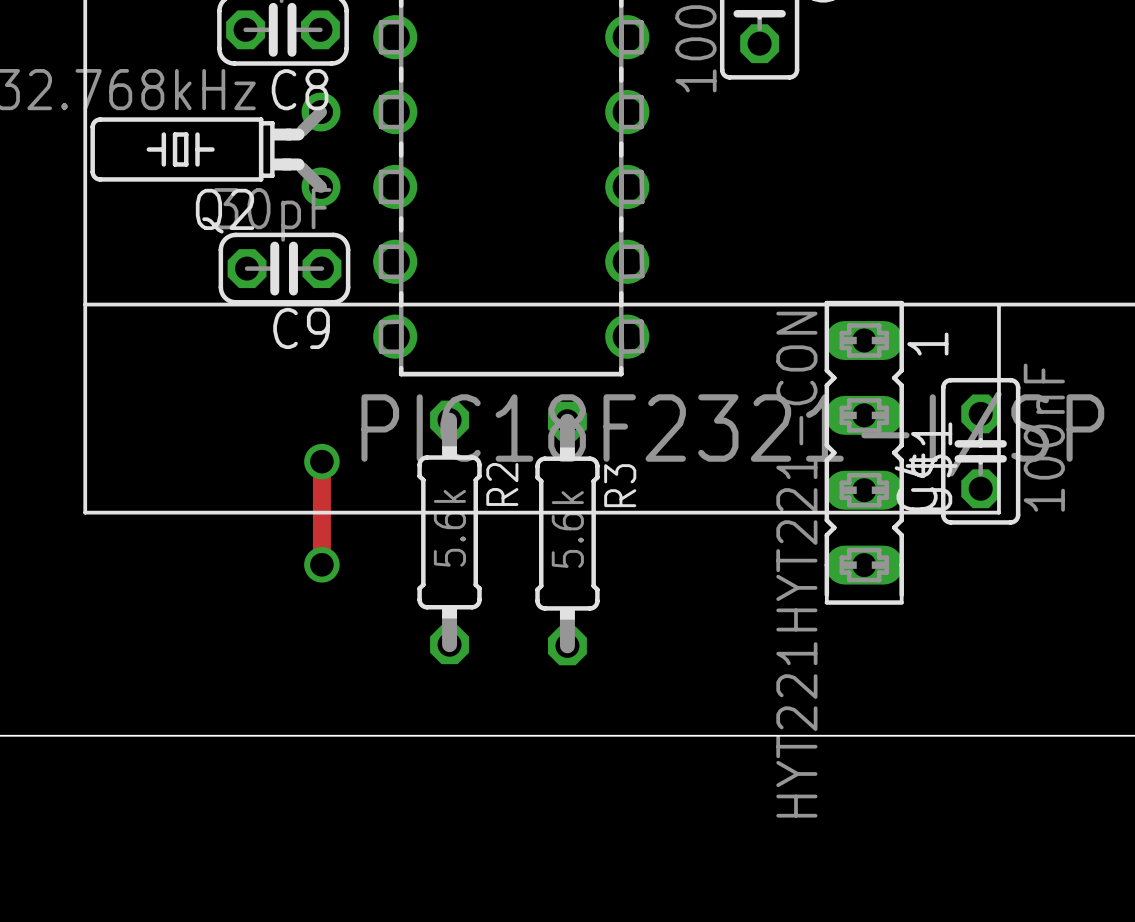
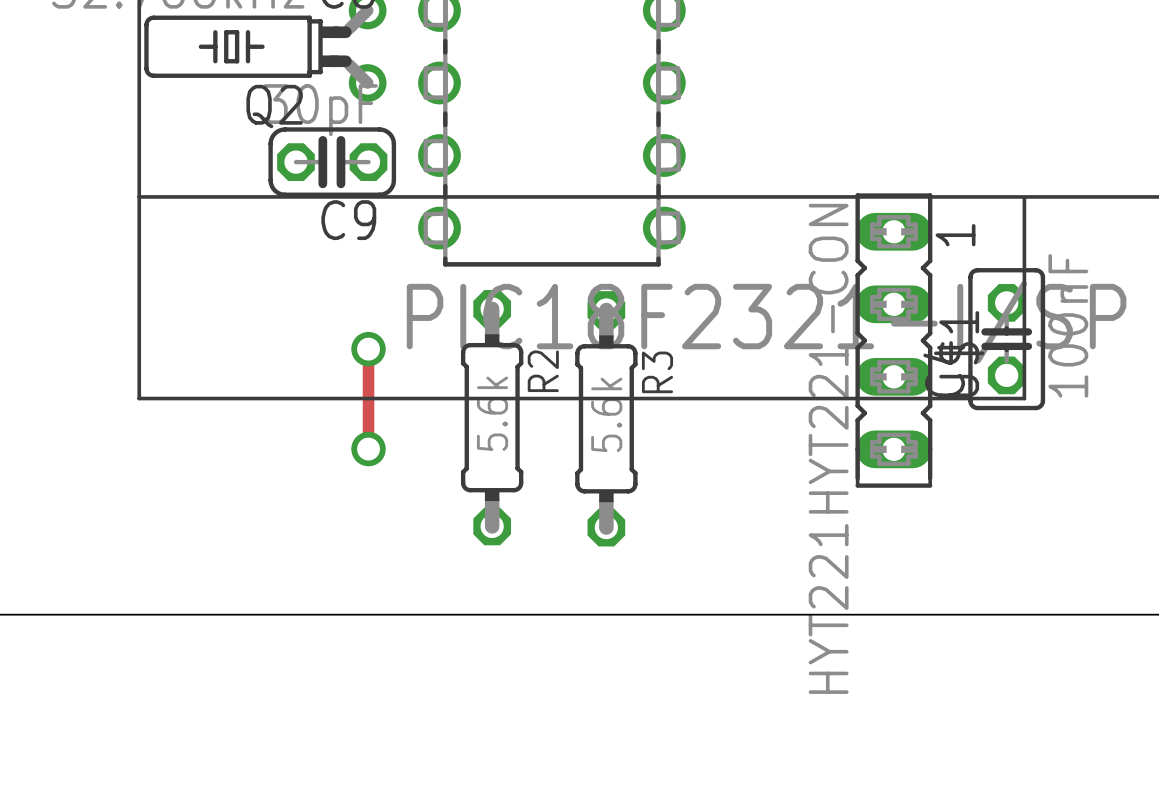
track width: thick (321, 461) (321, 564) -> thin (368, 349) (368, 449)

